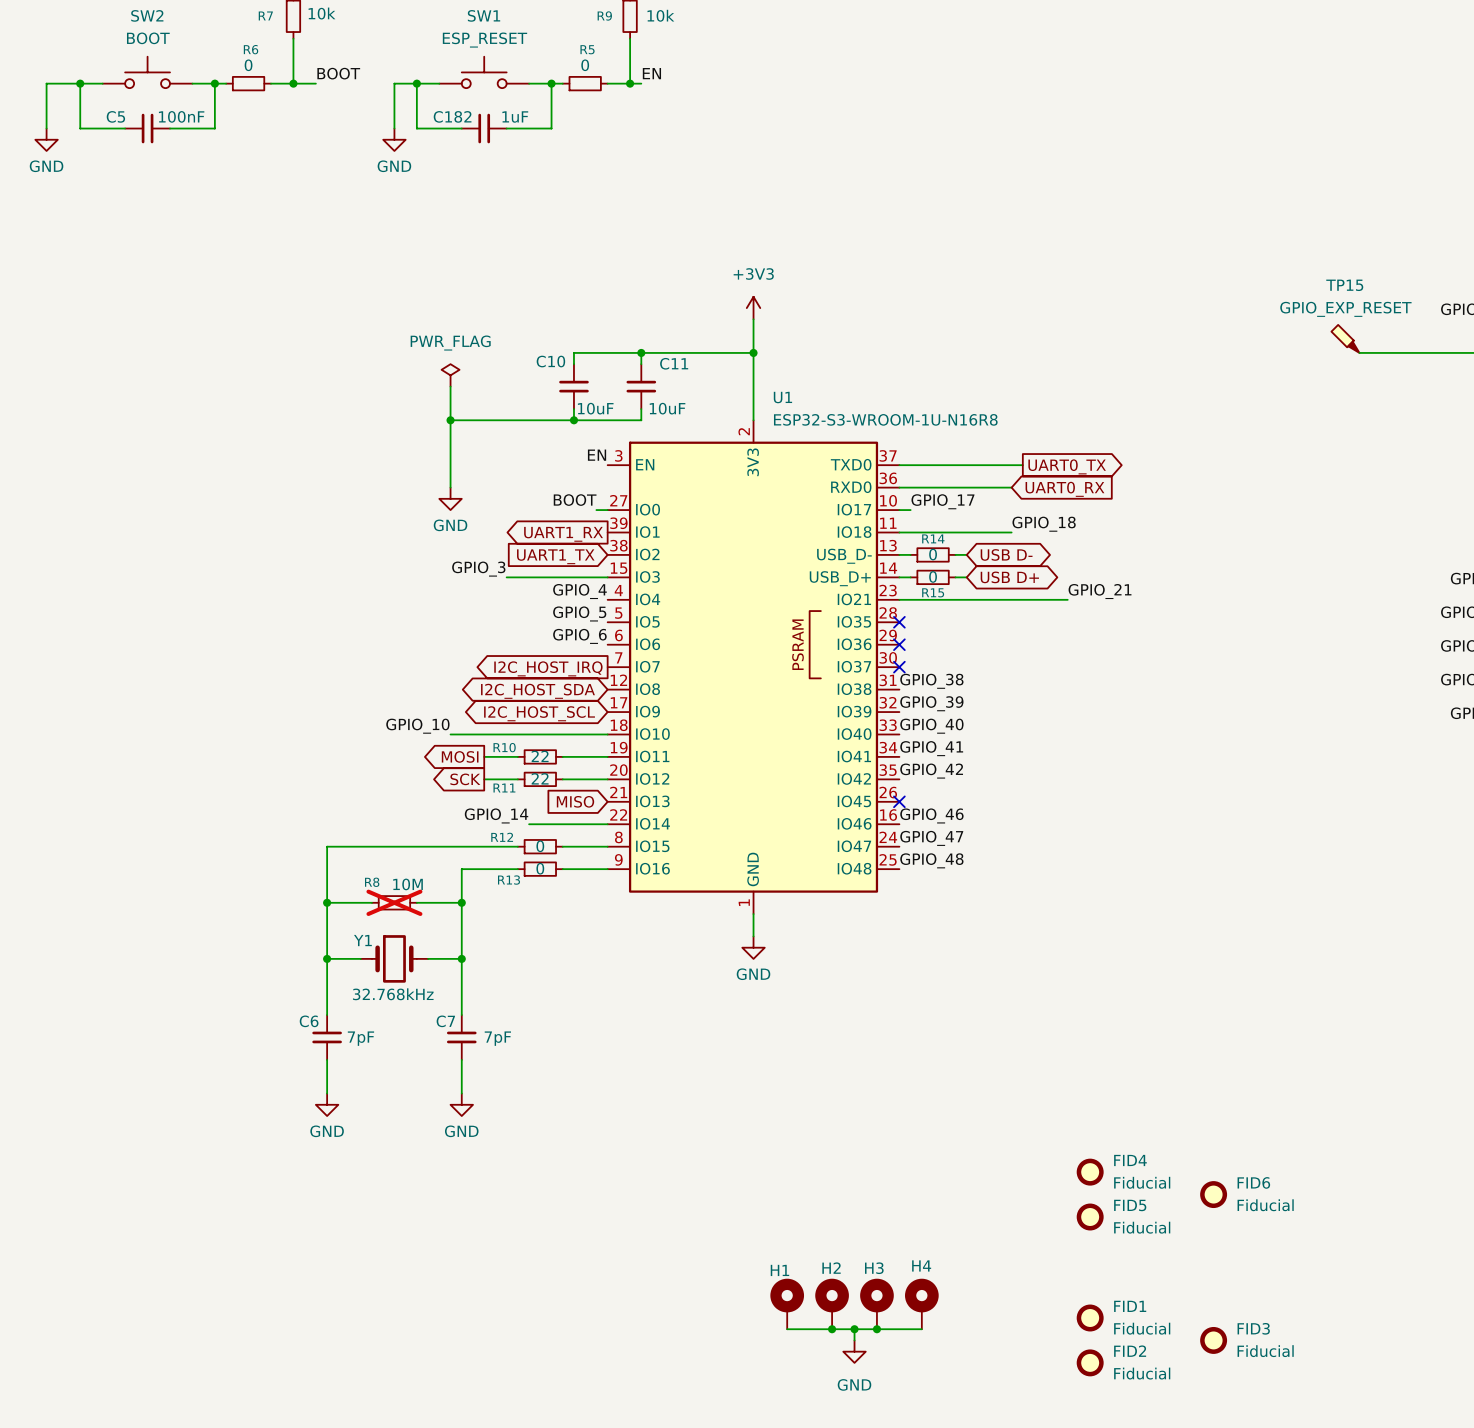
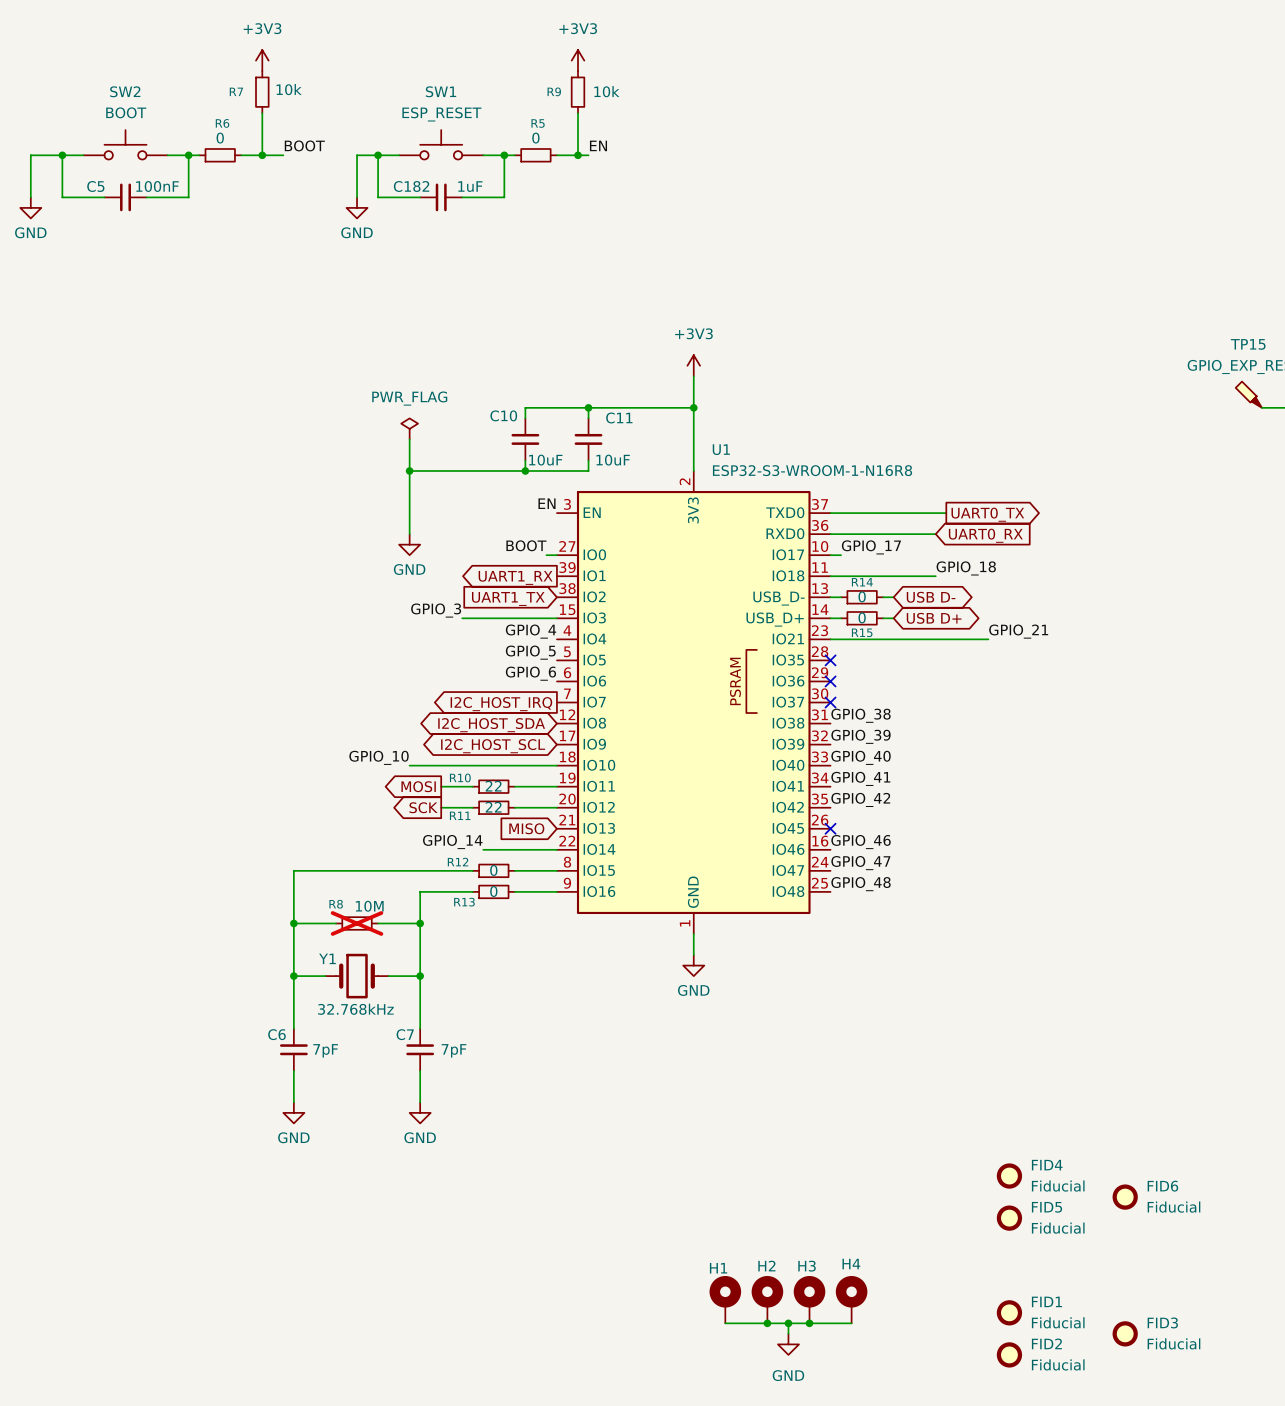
U1 value: ESP32-S3-WROOM-1U-N16R8 (885, 419) -> ESP32-S3-WROOM-1-N16R8 (812, 470)

